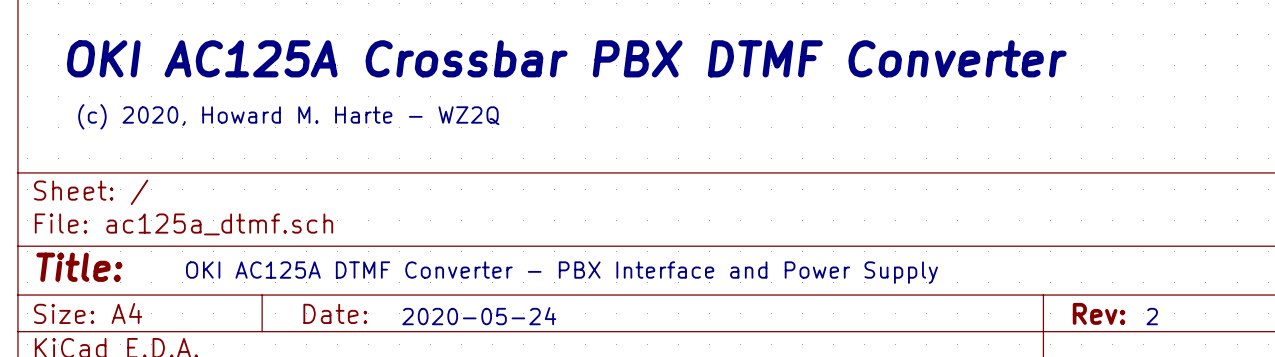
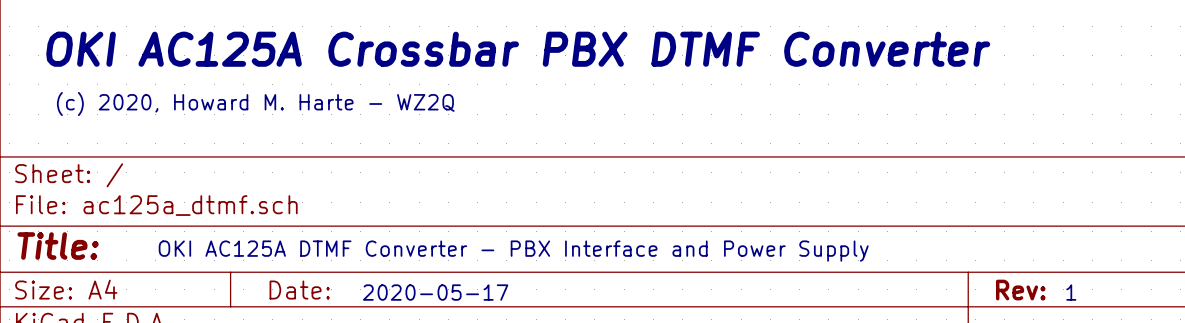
text: 2020-05-24 (479, 316) -> 2020-05-17 (435, 292)
text: 2 (1152, 316) -> 1 (1071, 292)

